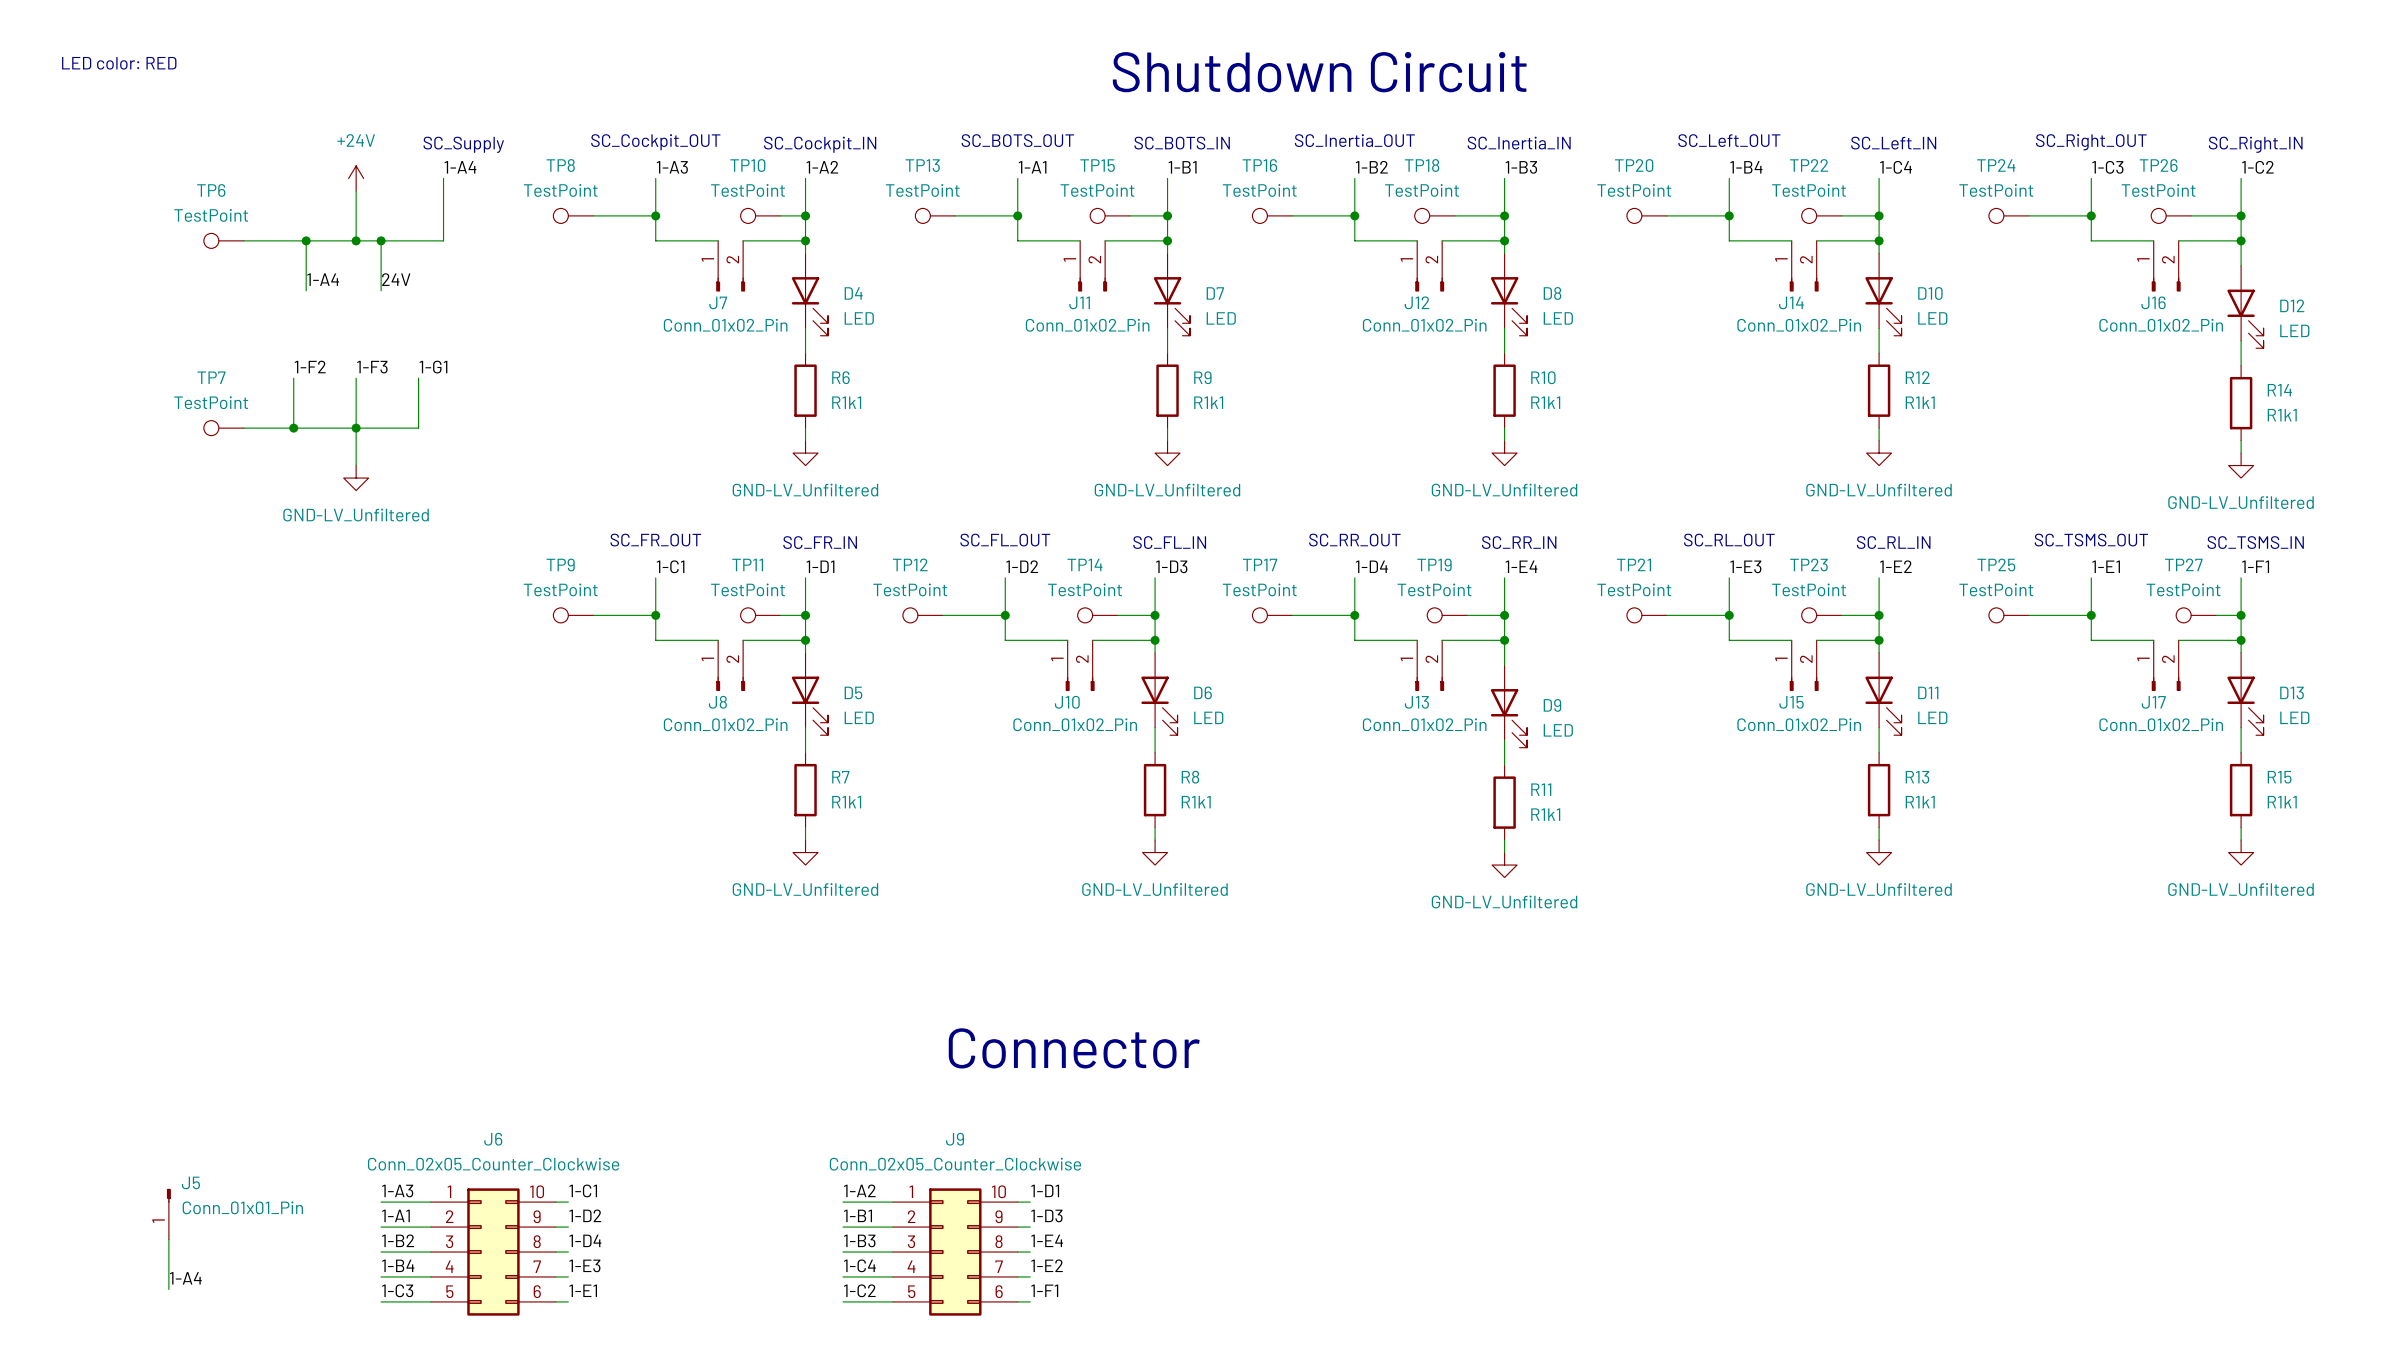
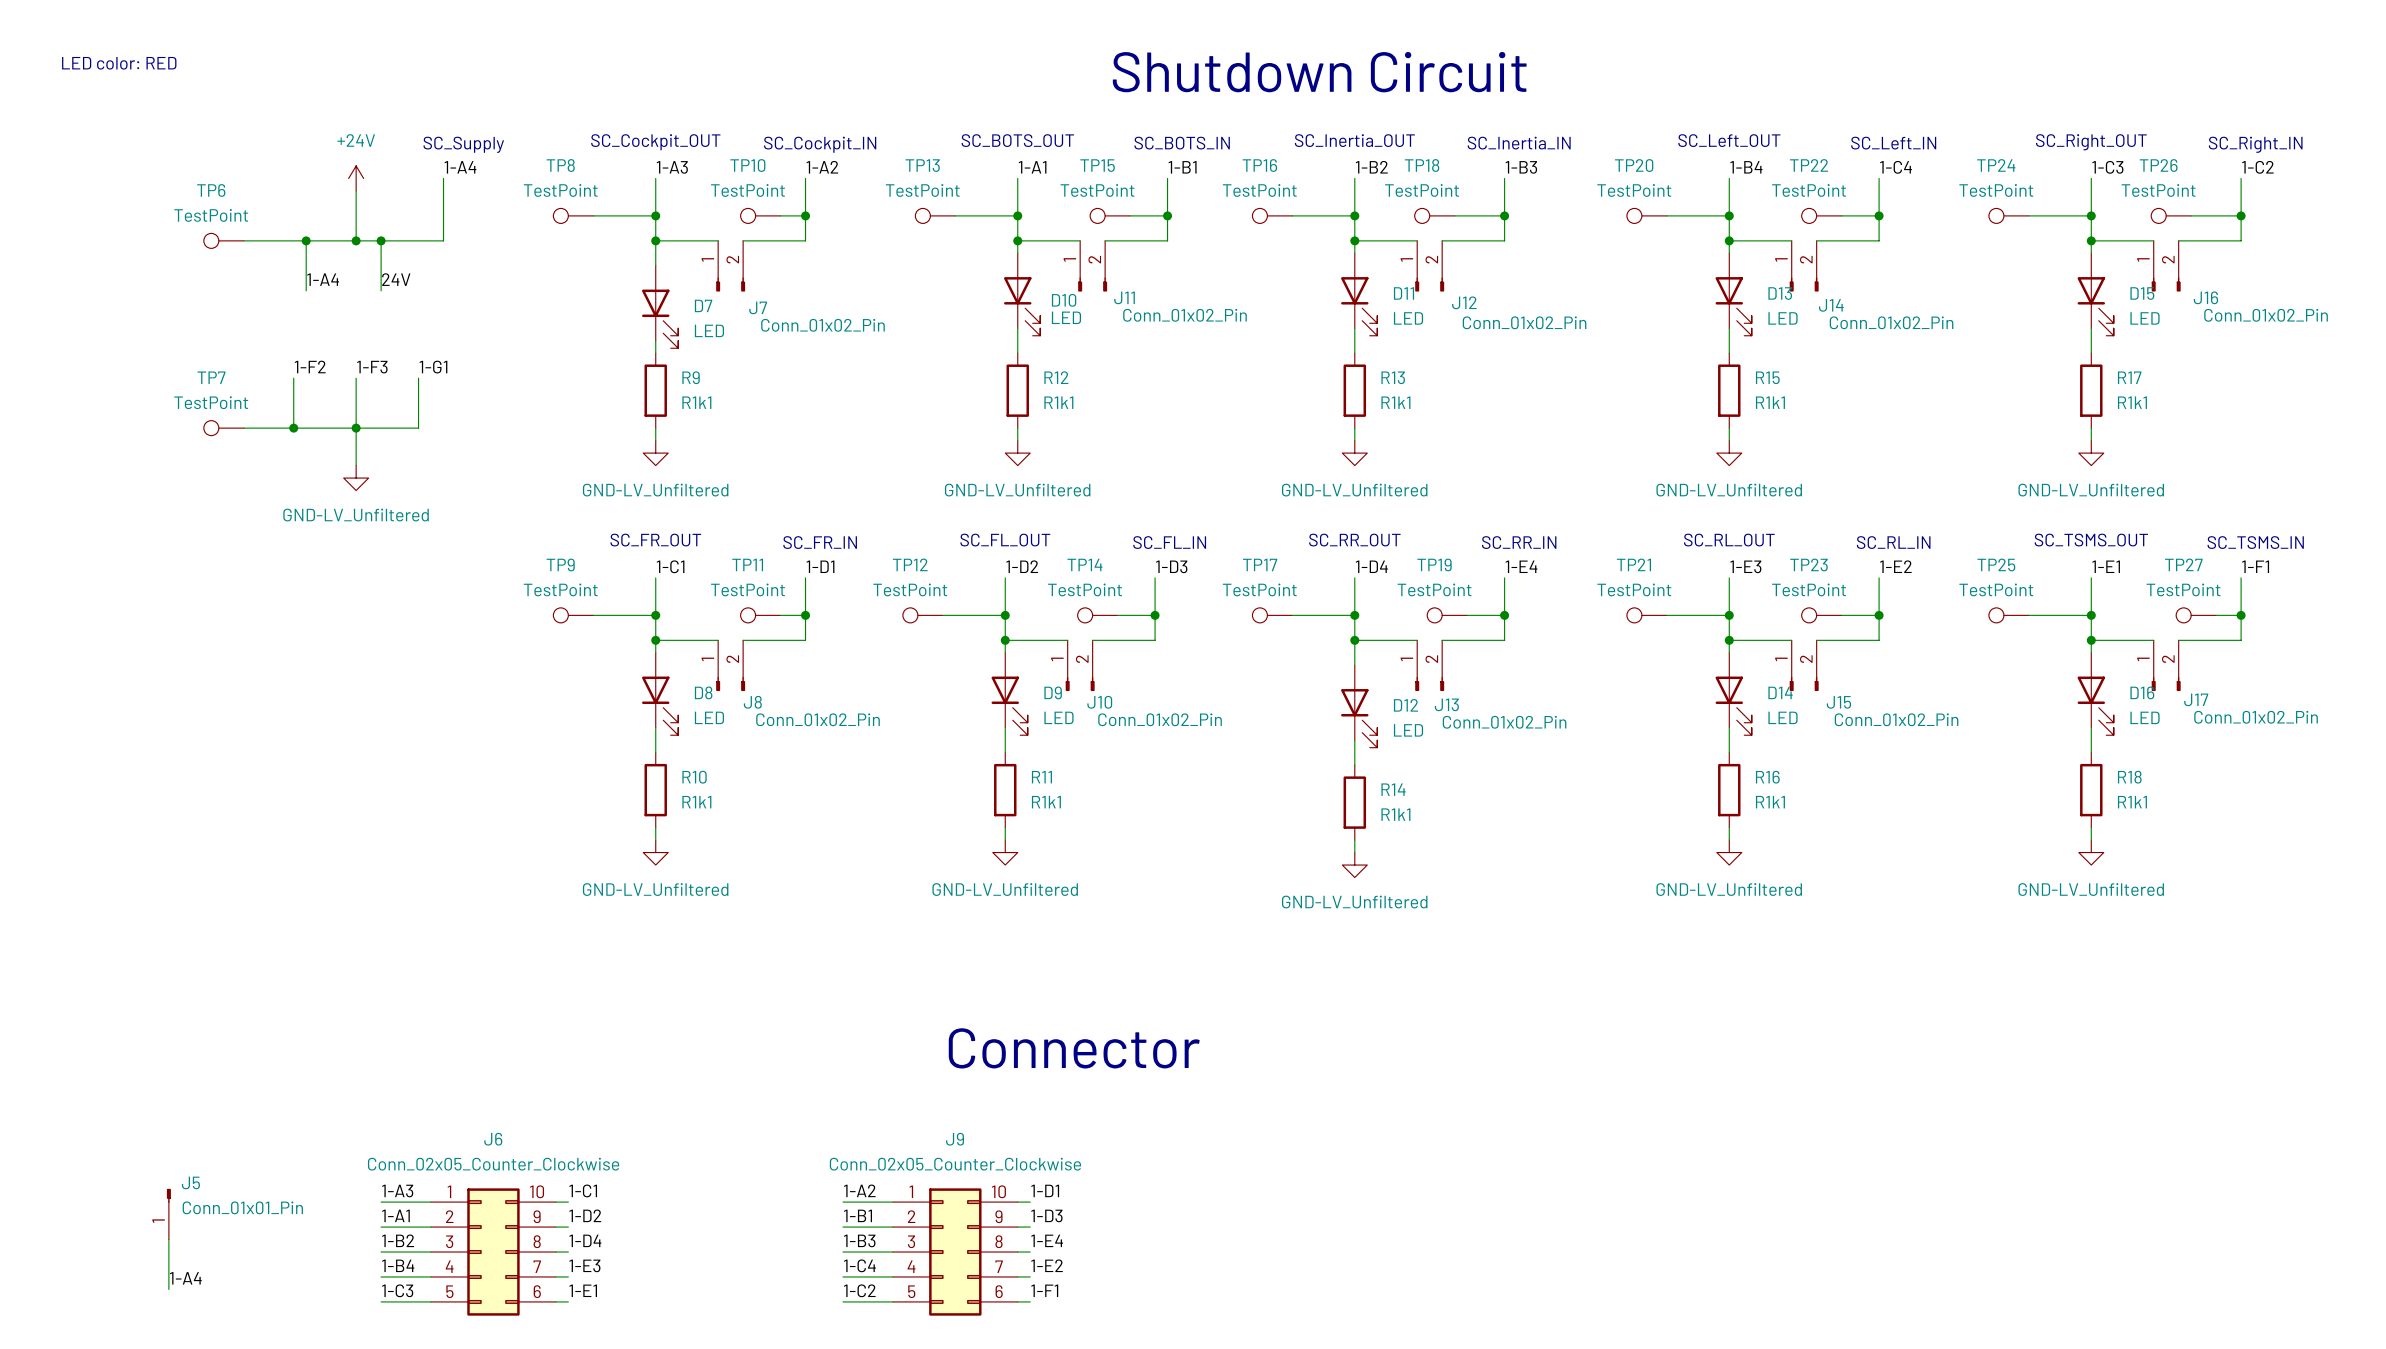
junction: none -> (655, 240)
wire: (805, 240) (805, 253) -> (655, 340) (655, 353)
junction: (805, 240) -> none
junction: none -> (1017, 240)
wire: (1167, 240) (1167, 253) -> (1017, 240) (1017, 253)
junction: (1167, 240) -> none
junction: none -> (1354, 240)
wire: (1504, 240) (1504, 253) -> (1354, 240) (1354, 253)
junction: (1504, 240) -> none
junction: none -> (1729, 240)
wire: (1879, 240) (1879, 253) -> (1729, 240) (1729, 253)
junction: (1879, 240) -> none
wire: none -> (2091, 240) (2091, 253)
junction: none -> (2091, 240)
wire: (2241, 240) (2241, 265) -> none
junction: (2241, 240) -> none
D10 name position: D10 (1930, 293) -> D10 (1064, 300)
D4: LED (809, 294) -> none
D7 position: (1171, 294) -> (660, 307)
D8 position: (1508, 294) -> (660, 694)
D10 position: (1883, 294) -> (1022, 294)
D15: none -> LED (2095, 294)
J7 name position: J7 (718, 302) -> J7 (758, 307)
J11 name position: J11 (1079, 302) -> J11 (1124, 297)
J12 name position: J12 (1416, 302) -> J12 (1464, 302)
J14 name position: J14 (1791, 302) -> J14 (1831, 305)
J16 name position: J16 (2153, 302) -> J16 (2205, 297)
D12 position: (2245, 307) -> (1359, 706)
D10 value position: LED (1932, 318) -> LED (1066, 317)
J7 value position: Conn_01x02_Pin (725, 325) -> Conn_01x02_Pin (822, 325)
J11 value position: Conn_01x02_Pin (1087, 325) -> Conn_01x02_Pin (1185, 315)
J12 value position: Conn_01x02_Pin (1424, 325) -> Conn_01x02_Pin (1524, 322)
J14 value position: Conn_01x02_Pin (1799, 325) -> Conn_01x02_Pin (1891, 322)
J16 value position: Conn_01x02_Pin (2161, 325) -> Conn_01x02_Pin (2266, 315)
wire: (805, 328) (805, 353) -> (655, 240) (655, 265)
wire: (1167, 328) (1167, 353) -> (1017, 328) (1017, 353)
wire: (1504, 328) (1504, 353) -> (1354, 328) (1354, 353)
wire: (1879, 328) (1879, 353) -> (1729, 328) (1729, 353)
wire: (2241, 340) (2241, 365) -> (2091, 328) (2091, 353)
R6: R1k1 (805, 390) -> none
R9 position: (1167, 390) -> (655, 390)
R10 position: (1504, 390) -> (655, 790)
R12 position: (1879, 390) -> (1017, 390)
R17: none -> R1k1 (2091, 390)
R14 position: (2241, 403) -> (1354, 802)
wire: (805, 428) (805, 440) -> (655, 428) (655, 440)
wire: (1167, 428) (1167, 440) -> (1017, 428) (1017, 440)
wire: (1504, 428) (1504, 440) -> (1354, 428) (1354, 440)
wire: (1879, 428) (1879, 440) -> (1729, 428) (1729, 440)
wire: (2241, 440) (2241, 453) -> (2091, 428) (2091, 440)
power symbol: none -> GND-LV_Unfiltered (655, 453)
power symbol: GND-LV_Unfiltered (805, 453) -> none
power symbol: none -> GND-LV_Unfiltered (1017, 453)
power symbol: GND-LV_Unfiltered (1167, 453) -> none
power symbol: none -> GND-LV_Unfiltered (1354, 453)
power symbol: GND-LV_Unfiltered (1504, 453) -> none
power symbol: none -> GND-LV_Unfiltered (1729, 453)
power symbol: GND-LV_Unfiltered (1879, 453) -> none
power symbol: none -> GND-LV_Unfiltered (2091, 453)
power symbol: GND-LV_Unfiltered (2241, 465) -> none
junction: none -> (655, 640)
wire: (805, 640) (805, 652) -> (655, 640) (655, 652)
junction: (805, 640) -> none
junction: none -> (1005, 640)
wire: (1155, 640) (1155, 652) -> (1005, 640) (1005, 652)
junction: (1155, 640) -> none
junction: none -> (1354, 640)
wire: (1504, 640) (1504, 665) -> (1354, 640) (1354, 665)
junction: (1504, 640) -> none
junction: none -> (1729, 640)
wire: (1879, 640) (1879, 652) -> (1729, 640) (1729, 652)
junction: (1879, 640) -> none
junction: none -> (2091, 640)
wire: (2241, 640) (2241, 652) -> (2091, 640) (2091, 652)
junction: (2241, 640) -> none
D5: LED (809, 694) -> none
D6: LED (1159, 694) -> none
D14: none -> LED (1733, 694)
D11 position: (1883, 694) -> (1359, 294)
D16: none -> LED (2095, 694)
D13 position: (2245, 694) -> (1733, 294)
J8 name position: J8 (717, 702) -> J8 (752, 702)
J10 name position: J10 (1067, 702) -> J10 (1099, 702)
J13 name position: J13 (1416, 702) -> J13 (1446, 704)
J15 name position: J15 (1791, 702) -> J15 (1838, 702)
J17 name position: J17 (2153, 702) -> J17 (2196, 699)
D9 position: (1508, 706) -> (1009, 694)
J8 value position: Conn_01x02_Pin (725, 724) -> Conn_01x02_Pin (818, 719)
J10 value position: Conn_01x02_Pin (1075, 724) -> Conn_01x02_Pin (1160, 719)
J13 value position: Conn_01x02_Pin (1424, 724) -> Conn_01x02_Pin (1504, 722)
J15 value position: Conn_01x02_Pin (1799, 724) -> Conn_01x02_Pin (1896, 719)
J17 value position: Conn_01x02_Pin (2161, 724) -> Conn_01x02_Pin (2256, 717)
wire: (805, 727) (805, 752) -> (655, 727) (655, 752)
wire: (1155, 727) (1155, 752) -> (1005, 727) (1005, 752)
wire: (1879, 727) (1879, 752) -> (1729, 727) (1729, 752)
wire: (2241, 727) (2241, 752) -> (2091, 727) (2091, 752)
wire: (1504, 740) (1504, 765) -> (1354, 740) (1354, 765)
R7: R1k1 (805, 790) -> none
R8: R1k1 (1155, 790) -> none
R16: none -> R1k1 (1729, 790)
R13 position: (1879, 790) -> (1354, 390)
R18: none -> R1k1 (2091, 790)
R15 position: (2241, 790) -> (1729, 390)
R11 position: (1504, 802) -> (1005, 790)
wire: (805, 827) (805, 840) -> (655, 827) (655, 840)
wire: (1155, 827) (1155, 840) -> (1005, 827) (1005, 840)
wire: (1879, 827) (1879, 840) -> (1729, 827) (1729, 840)
wire: (2241, 827) (2241, 840) -> (2091, 827) (2091, 840)
wire: (1504, 840) (1504, 852) -> (1354, 840) (1354, 852)
power symbol: none -> GND-LV_Unfiltered (655, 852)
power symbol: GND-LV_Unfiltered (805, 852) -> none
power symbol: none -> GND-LV_Unfiltered (1005, 852)
power symbol: GND-LV_Unfiltered (1155, 852) -> none
power symbol: none -> GND-LV_Unfiltered (1729, 852)
power symbol: GND-LV_Unfiltered (1879, 852) -> none
power symbol: none -> GND-LV_Unfiltered (2091, 852)
power symbol: GND-LV_Unfiltered (2241, 852) -> none
power symbol: none -> GND-LV_Unfiltered (1354, 865)
power symbol: GND-LV_Unfiltered (1504, 865) -> none

